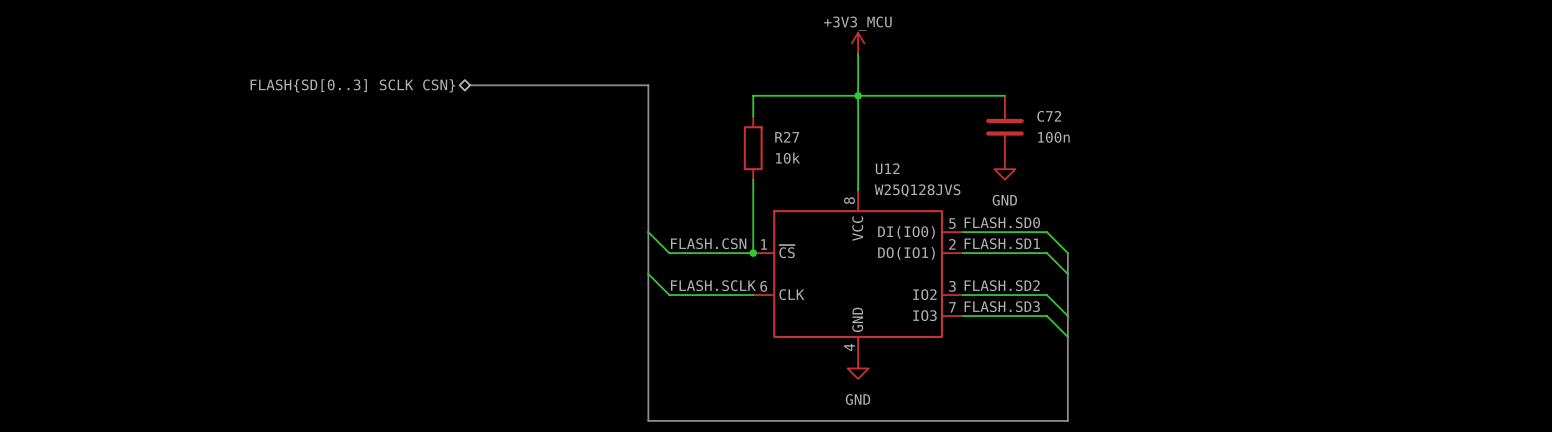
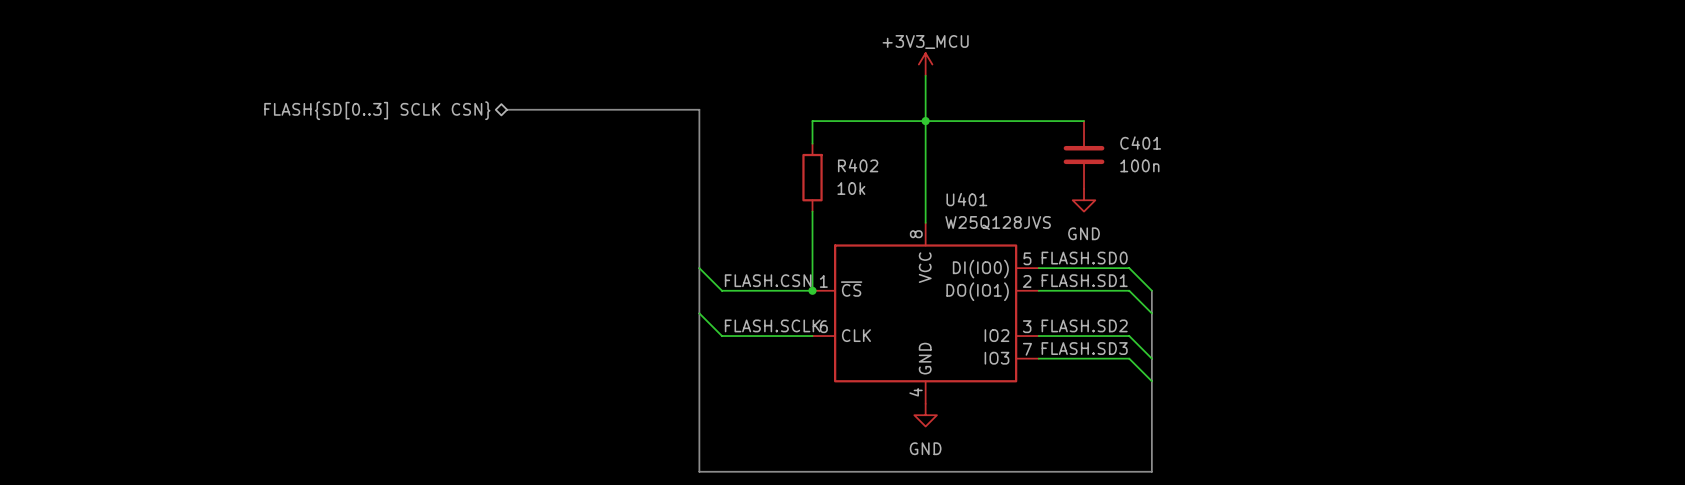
C72 name: C72 (1049, 116) -> C401 (1140, 143)
R27 name: R27 (787, 137) -> R402 (858, 165)
U12 name: U12 (887, 168) -> U401 (966, 199)

